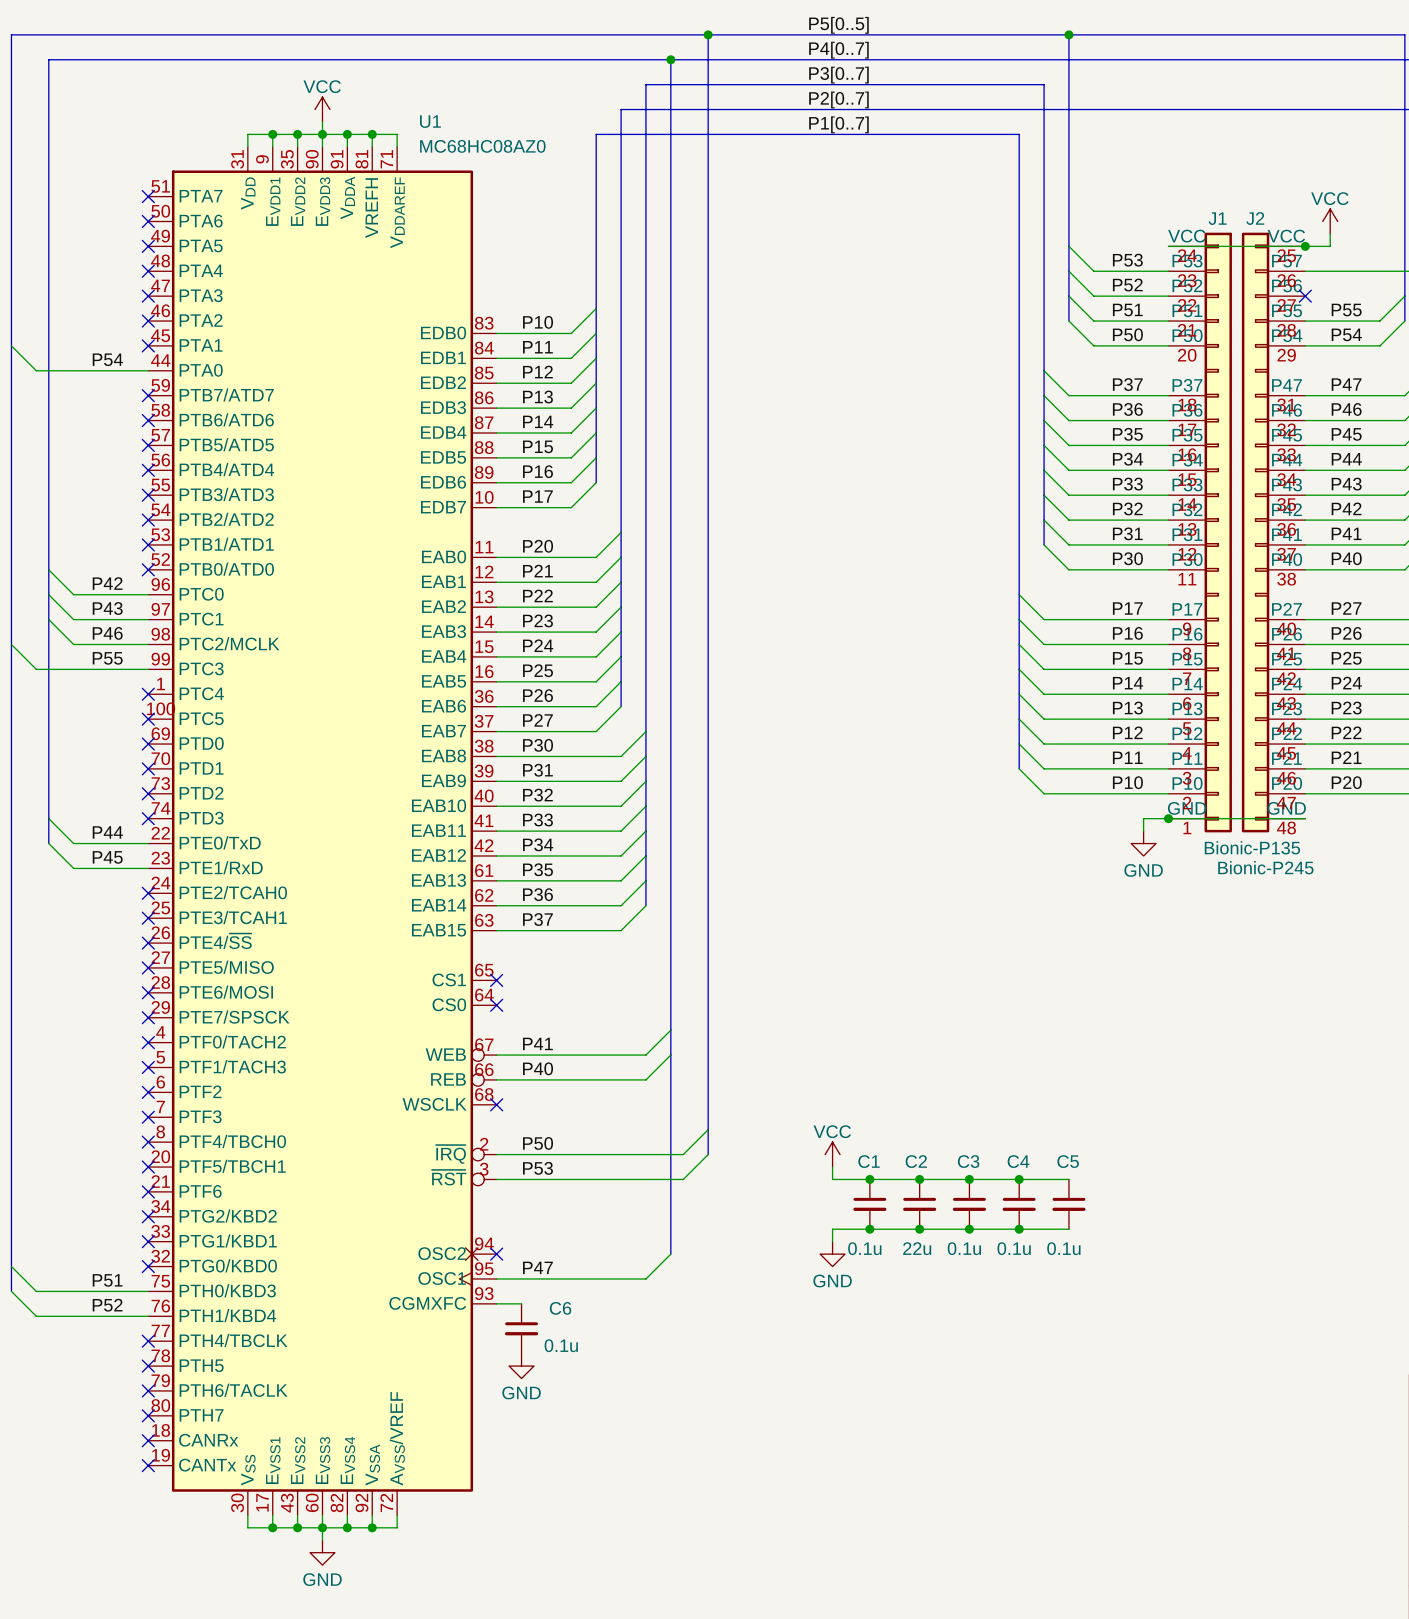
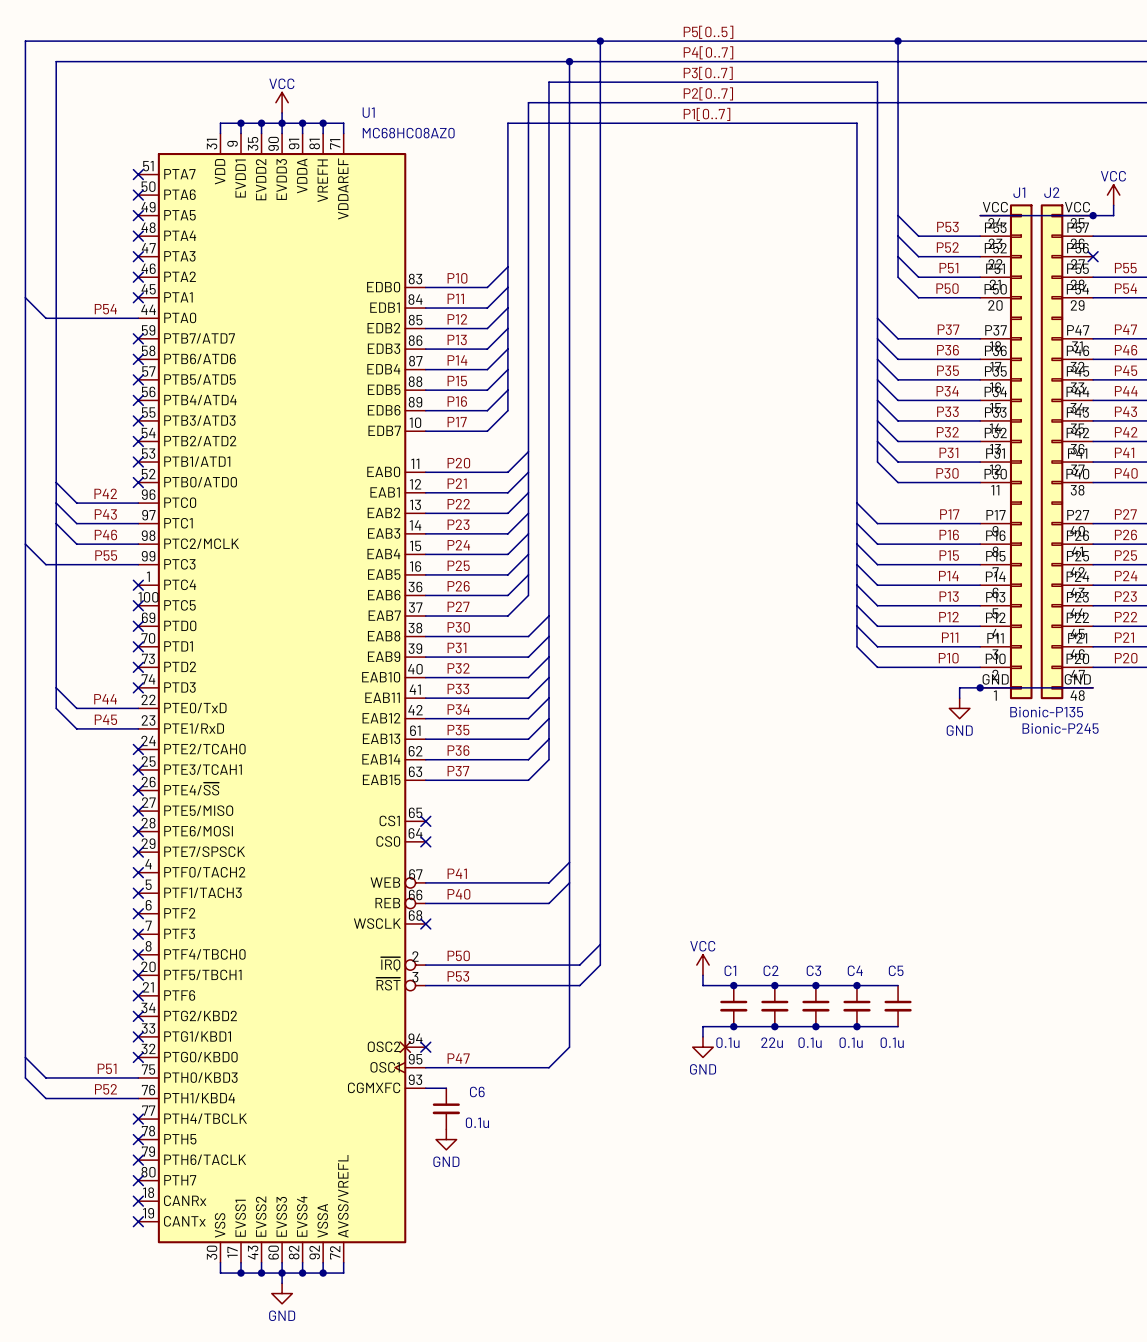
U1 symbol: [148, 146, 497, 1516] -> [138, 133, 426, 1263]

